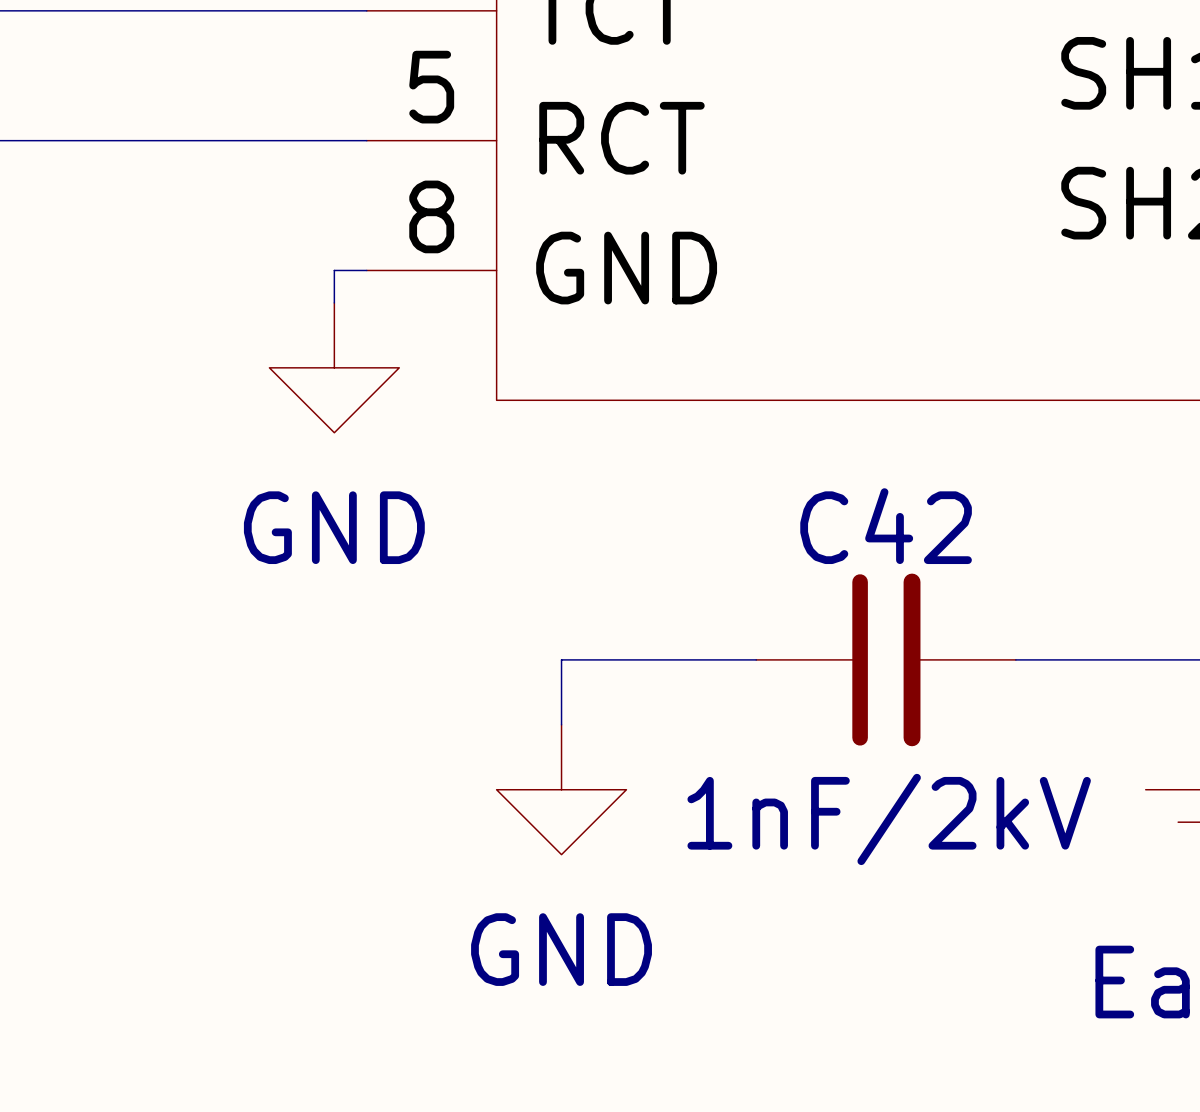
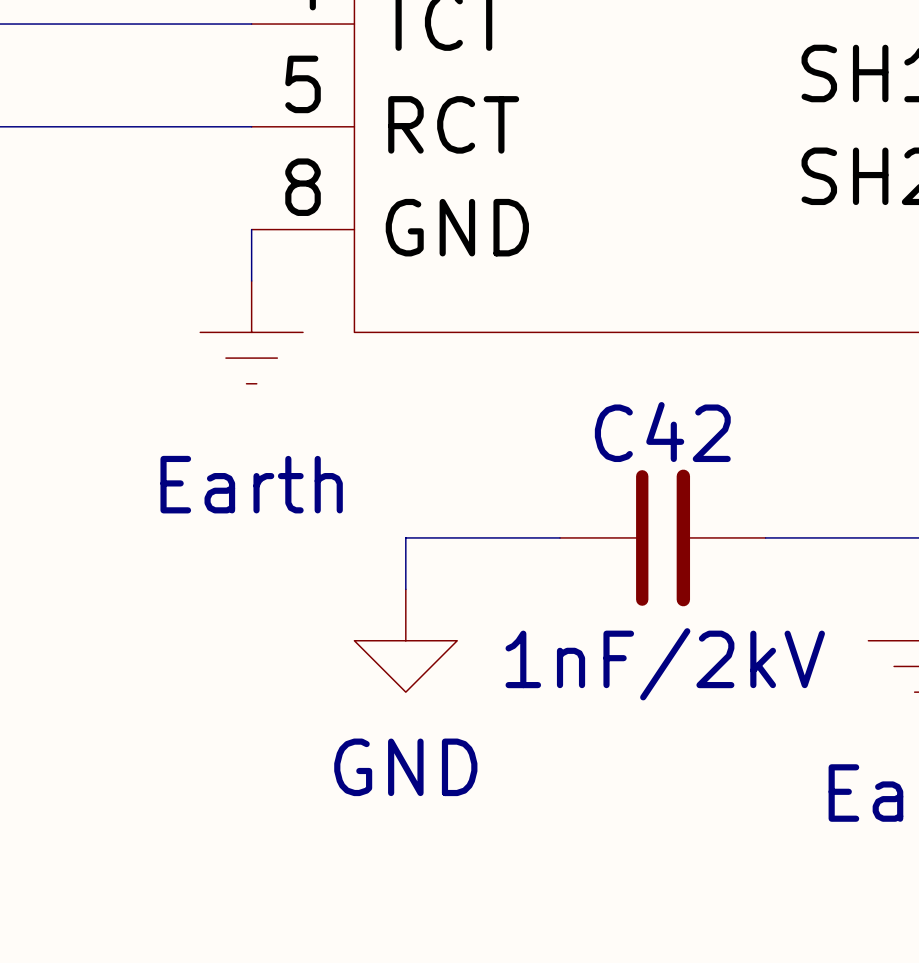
wire: (366, 270) (334, 270) (334, 302) -> (251, 229) (251, 280)
power symbol: GND (334, 367) -> Earth (251, 332)

